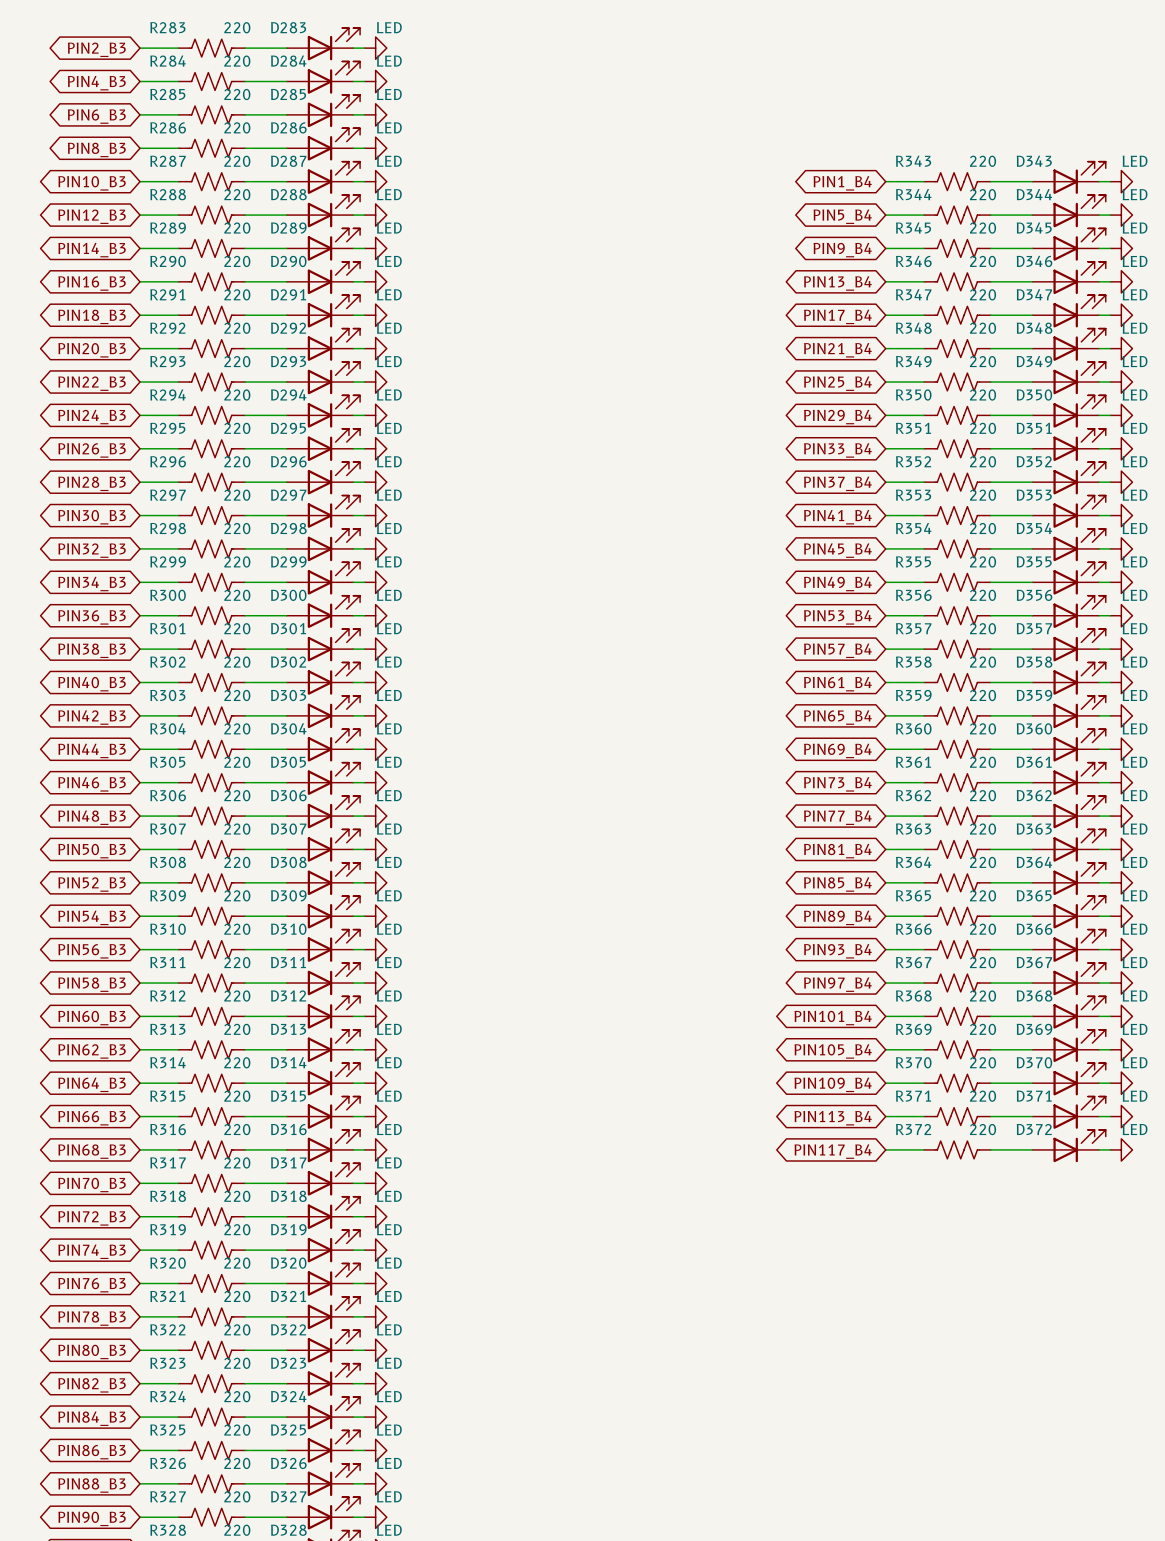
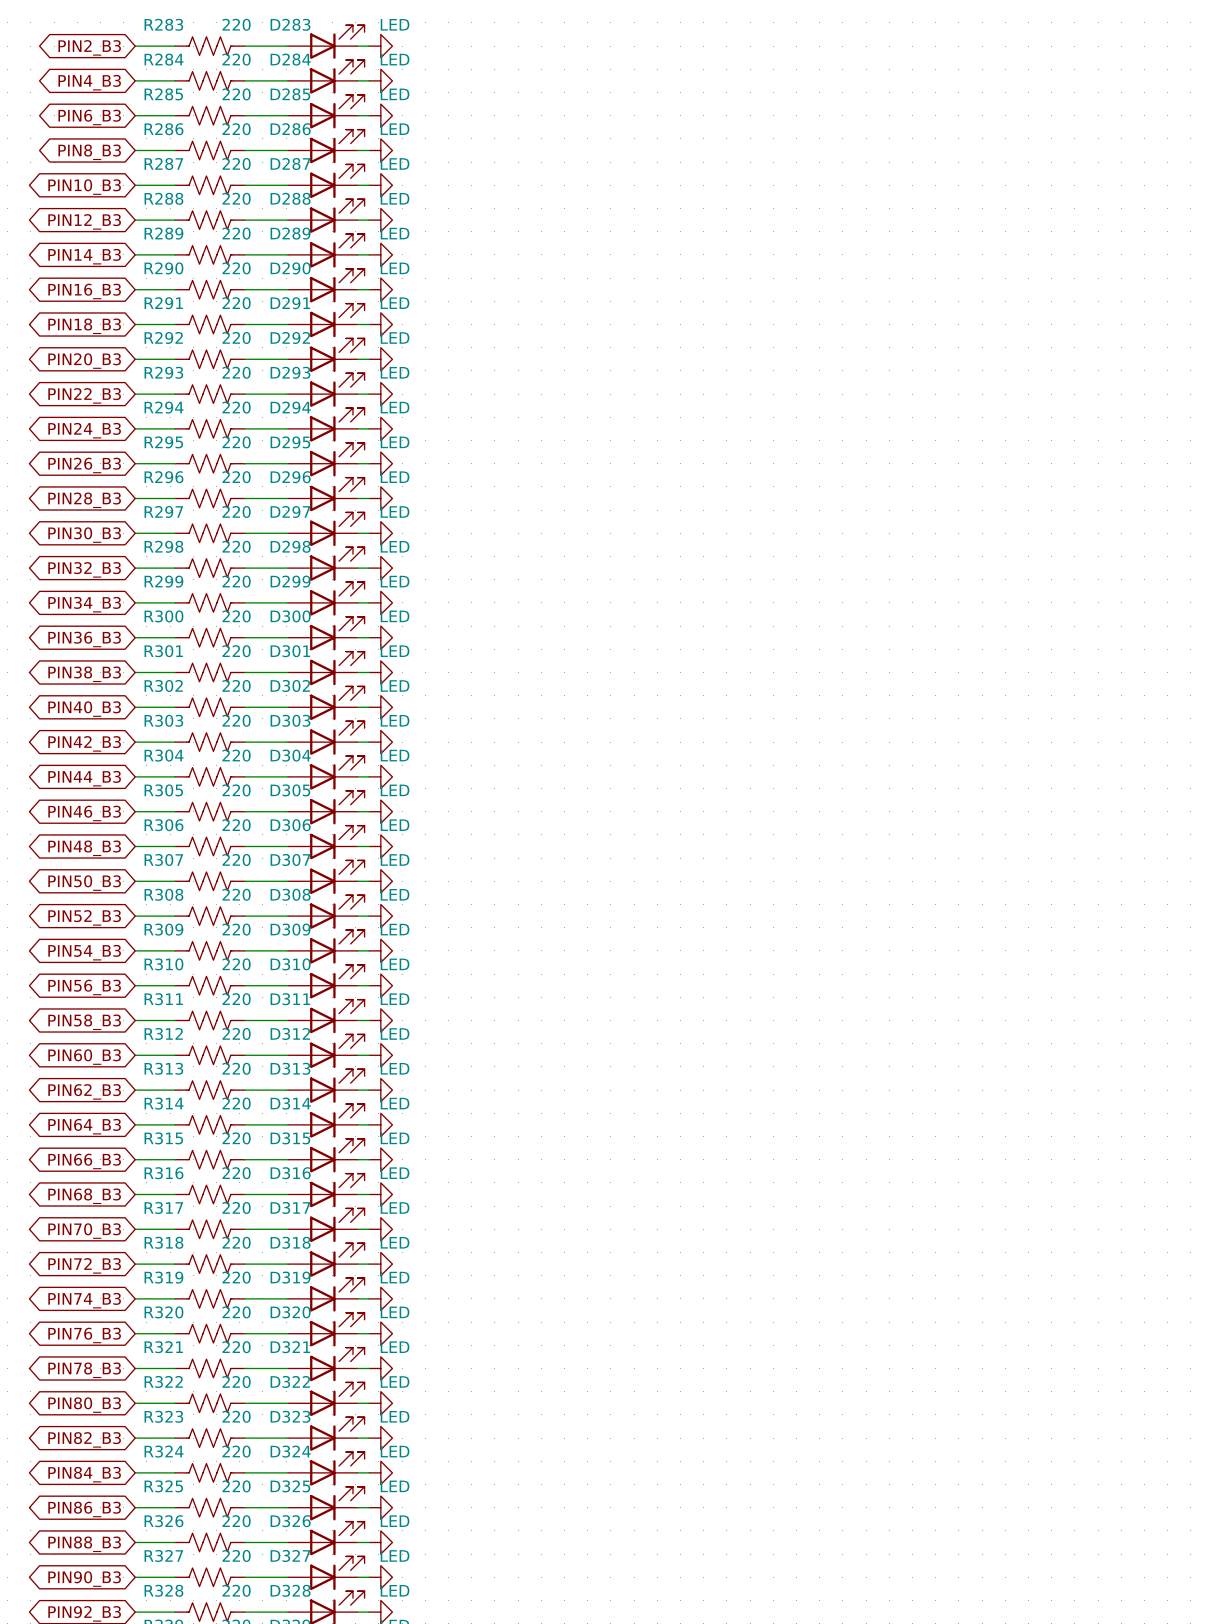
D343: LED (1069, 177) -> none
wire: (885, 181) (923, 181) -> none
R343: 220 (957, 181) -> none
wire: (990, 181) (1032, 181) -> none
wire: (1099, 181) (1110, 181) -> none
power symbol: (1121, 181) -> none
global label: PIN1_B4 (842, 183) -> none
D344: LED (1069, 211) -> none
wire: (885, 215) (923, 215) -> none
R344: 220 (957, 215) -> none
wire: (990, 215) (1032, 215) -> none
wire: (1099, 215) (1110, 215) -> none
power symbol: (1121, 215) -> none
global label: PIN5_B4 (842, 216) -> none
D345: LED (1069, 244) -> none
wire: (885, 248) (923, 248) -> none
R345: 220 (957, 248) -> none
wire: (990, 248) (1032, 248) -> none
wire: (1099, 248) (1110, 248) -> none
power symbol: (1121, 248) -> none
global label: PIN9_B4 (842, 250) -> none
D346: LED (1069, 277) -> none
wire: (885, 281) (923, 281) -> none
R346: 220 (957, 281) -> none
wire: (990, 281) (1032, 281) -> none
wire: (1099, 281) (1110, 281) -> none
power symbol: (1121, 281) -> none
global label: PIN13_B4 (837, 283) -> none
D347: LED (1069, 311) -> none
wire: (885, 315) (923, 315) -> none
R347: 220 (957, 315) -> none
wire: (990, 315) (1032, 315) -> none
wire: (1099, 315) (1110, 315) -> none
power symbol: (1121, 315) -> none
global label: PIN17_B4 (837, 316) -> none
D348: LED (1069, 344) -> none
wire: (885, 348) (923, 348) -> none
R348: 220 (957, 348) -> none
wire: (990, 348) (1032, 348) -> none
wire: (1099, 348) (1110, 348) -> none
power symbol: (1121, 348) -> none
global label: PIN21_B4 (837, 350) -> none
D349: LED (1069, 378) -> none
wire: (885, 382) (923, 382) -> none
R349: 220 (957, 382) -> none
wire: (990, 382) (1032, 382) -> none
wire: (1099, 382) (1110, 382) -> none
power symbol: (1121, 382) -> none
global label: PIN25_B4 (837, 383) -> none
D350: LED (1069, 411) -> none
wire: (885, 415) (923, 415) -> none
R350: 220 (957, 415) -> none
wire: (990, 415) (1032, 415) -> none
wire: (1099, 415) (1110, 415) -> none
power symbol: (1121, 415) -> none
global label: PIN29_B4 (837, 417) -> none
D351: LED (1069, 444) -> none
wire: (885, 448) (923, 448) -> none
R351: 220 (957, 448) -> none
wire: (990, 448) (1032, 448) -> none
wire: (1099, 448) (1110, 448) -> none
power symbol: (1121, 448) -> none
global label: PIN33_B4 (837, 450) -> none
D352: LED (1069, 478) -> none
wire: (885, 482) (923, 482) -> none
R352: 220 (957, 482) -> none
wire: (990, 482) (1032, 482) -> none
wire: (1099, 482) (1110, 482) -> none
power symbol: (1121, 482) -> none
global label: PIN37_B4 (837, 483) -> none
D353: LED (1069, 511) -> none
wire: (885, 515) (923, 515) -> none
R353: 220 (957, 515) -> none
wire: (990, 515) (1032, 515) -> none
wire: (1099, 515) (1110, 515) -> none
power symbol: (1121, 515) -> none
global label: PIN41_B4 (837, 517) -> none
D354: LED (1069, 545) -> none
wire: (885, 548) (923, 548) -> none
R354: 220 (957, 548) -> none
wire: (990, 548) (1032, 548) -> none
wire: (1099, 548) (1110, 548) -> none
power symbol: (1121, 548) -> none
global label: PIN45_B4 (837, 550) -> none
D355: LED (1069, 578) -> none
wire: (885, 582) (923, 582) -> none
R355: 220 (957, 582) -> none
wire: (990, 582) (1032, 582) -> none
wire: (1099, 582) (1110, 582) -> none
power symbol: (1121, 582) -> none
global label: PIN49_B4 (837, 584) -> none
D356: LED (1069, 611) -> none
wire: (885, 615) (923, 615) -> none
R356: 220 (957, 615) -> none
wire: (990, 615) (1032, 615) -> none
wire: (1099, 615) (1110, 615) -> none
power symbol: (1121, 615) -> none
global label: PIN53_B4 (837, 617) -> none
D357: LED (1069, 645) -> none
wire: (885, 649) (923, 649) -> none
R357: 220 (957, 649) -> none
wire: (990, 649) (1032, 649) -> none
wire: (1099, 649) (1110, 649) -> none
power symbol: (1121, 649) -> none
global label: PIN57_B4 (837, 650) -> none
D358: LED (1069, 678) -> none
wire: (885, 682) (923, 682) -> none
R358: 220 (957, 682) -> none
wire: (990, 682) (1032, 682) -> none
wire: (1099, 682) (1110, 682) -> none
power symbol: (1121, 682) -> none
global label: PIN61_B4 (837, 684) -> none
D359: LED (1069, 712) -> none
wire: (885, 715) (923, 715) -> none
R359: 220 (957, 715) -> none
wire: (990, 715) (1032, 715) -> none
wire: (1099, 715) (1110, 715) -> none
power symbol: (1121, 715) -> none
global label: PIN65_B4 (837, 717) -> none
D360: LED (1069, 745) -> none
wire: (885, 749) (923, 749) -> none
R360: 220 (957, 749) -> none
wire: (990, 749) (1032, 749) -> none
wire: (1099, 749) (1110, 749) -> none
power symbol: (1121, 749) -> none
global label: PIN69_B4 (837, 750) -> none
D361: LED (1069, 778) -> none
wire: (885, 782) (923, 782) -> none
R361: 220 (957, 782) -> none
wire: (990, 782) (1032, 782) -> none
wire: (1099, 782) (1110, 782) -> none
power symbol: (1121, 782) -> none
global label: PIN73_B4 (837, 784) -> none
D362: LED (1069, 812) -> none
wire: (885, 816) (923, 816) -> none
R362: 220 (957, 816) -> none
wire: (990, 816) (1032, 816) -> none
wire: (1099, 816) (1110, 816) -> none
power symbol: (1121, 816) -> none
global label: PIN77_B4 (837, 817) -> none
D363: LED (1069, 845) -> none
wire: (885, 849) (923, 849) -> none
R363: 220 (957, 849) -> none
wire: (990, 849) (1032, 849) -> none
wire: (1099, 849) (1110, 849) -> none
power symbol: (1121, 849) -> none
global label: PIN81_B4 (837, 851) -> none
D364: LED (1069, 878) -> none
wire: (885, 882) (923, 882) -> none
R364: 220 (957, 882) -> none
wire: (990, 882) (1032, 882) -> none
wire: (1099, 882) (1110, 882) -> none
power symbol: (1121, 882) -> none
global label: PIN85_B4 (837, 884) -> none
D365: LED (1069, 912) -> none
wire: (885, 916) (923, 916) -> none
R365: 220 (957, 916) -> none
wire: (990, 916) (1032, 916) -> none
wire: (1099, 916) (1110, 916) -> none
power symbol: (1121, 916) -> none
global label: PIN89_B4 (837, 917) -> none
D366: LED (1069, 945) -> none
wire: (885, 949) (923, 949) -> none
R366: 220 (957, 949) -> none
wire: (990, 949) (1032, 949) -> none
wire: (1099, 949) (1110, 949) -> none
power symbol: (1121, 949) -> none
global label: PIN93_B4 (837, 951) -> none
D367: LED (1069, 979) -> none
wire: (885, 983) (923, 983) -> none
R367: 220 (957, 983) -> none
wire: (990, 983) (1032, 983) -> none
wire: (1099, 983) (1110, 983) -> none
power symbol: (1121, 983) -> none
global label: PIN97_B4 (837, 984) -> none
D368: LED (1069, 1012) -> none
wire: (885, 1016) (923, 1016) -> none
R368: 220 (957, 1016) -> none
wire: (990, 1016) (1032, 1016) -> none
wire: (1099, 1016) (1110, 1016) -> none
power symbol: (1121, 1016) -> none
global label: PIN101_B4 (833, 1018) -> none
D369: LED (1069, 1045) -> none
wire: (885, 1049) (923, 1049) -> none
R369: 220 (957, 1049) -> none
wire: (990, 1049) (1032, 1049) -> none
wire: (1099, 1049) (1110, 1049) -> none
power symbol: (1121, 1049) -> none
global label: PIN105_B4 (833, 1051) -> none
D370: LED (1069, 1079) -> none
wire: (885, 1083) (923, 1083) -> none
R370: 220 (957, 1083) -> none
wire: (990, 1083) (1032, 1083) -> none
wire: (1099, 1083) (1110, 1083) -> none
power symbol: (1121, 1083) -> none
global label: PIN109_B4 (833, 1084) -> none
D371: LED (1069, 1112) -> none
wire: (885, 1116) (923, 1116) -> none
R371: 220 (957, 1116) -> none
wire: (990, 1116) (1032, 1116) -> none
wire: (1099, 1116) (1110, 1116) -> none
power symbol: (1121, 1116) -> none
global label: PIN113_B4 (833, 1118) -> none
D372: LED (1069, 1146) -> none
wire: (885, 1149) (923, 1149) -> none
R372: 220 (957, 1149) -> none
wire: (990, 1149) (1032, 1149) -> none
wire: (1099, 1149) (1110, 1149) -> none
power symbol: (1121, 1149) -> none
global label: PIN117_B4 (833, 1151) -> none

